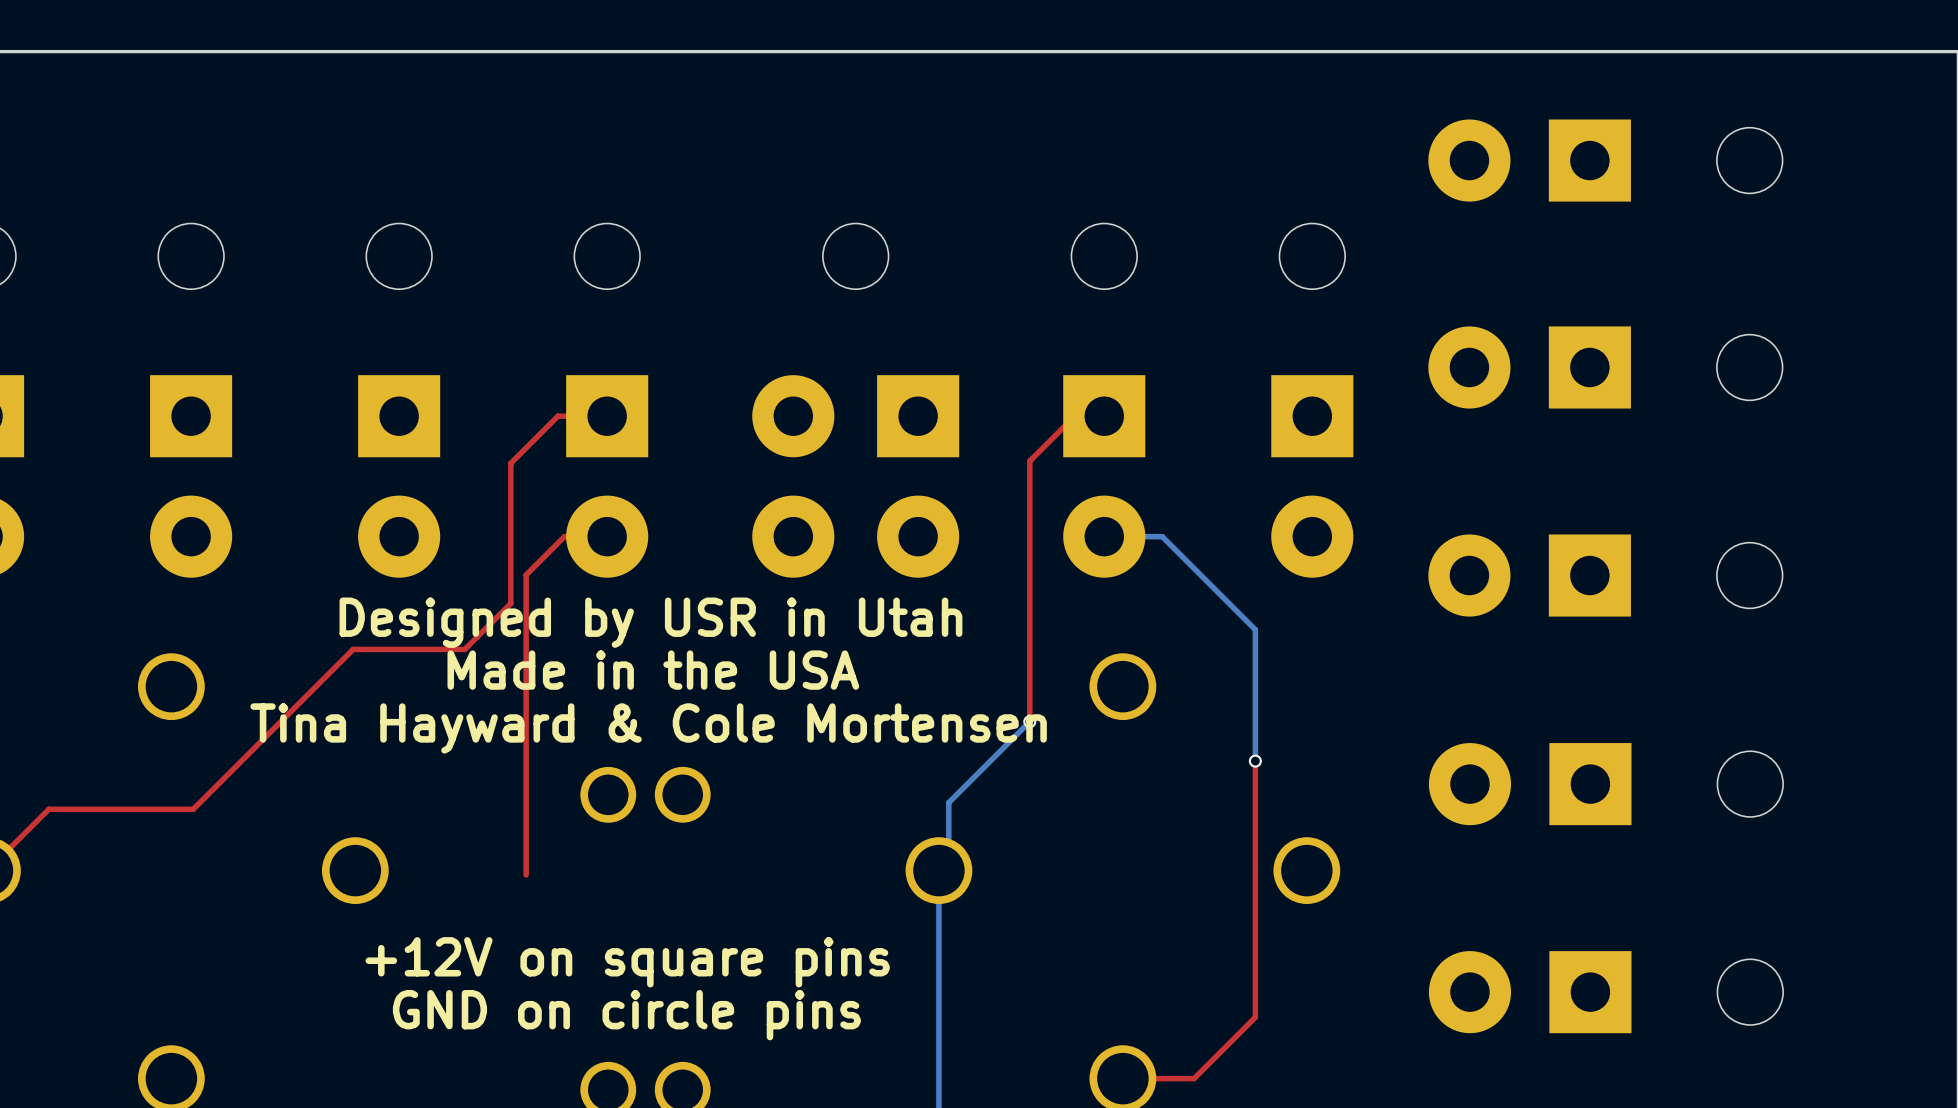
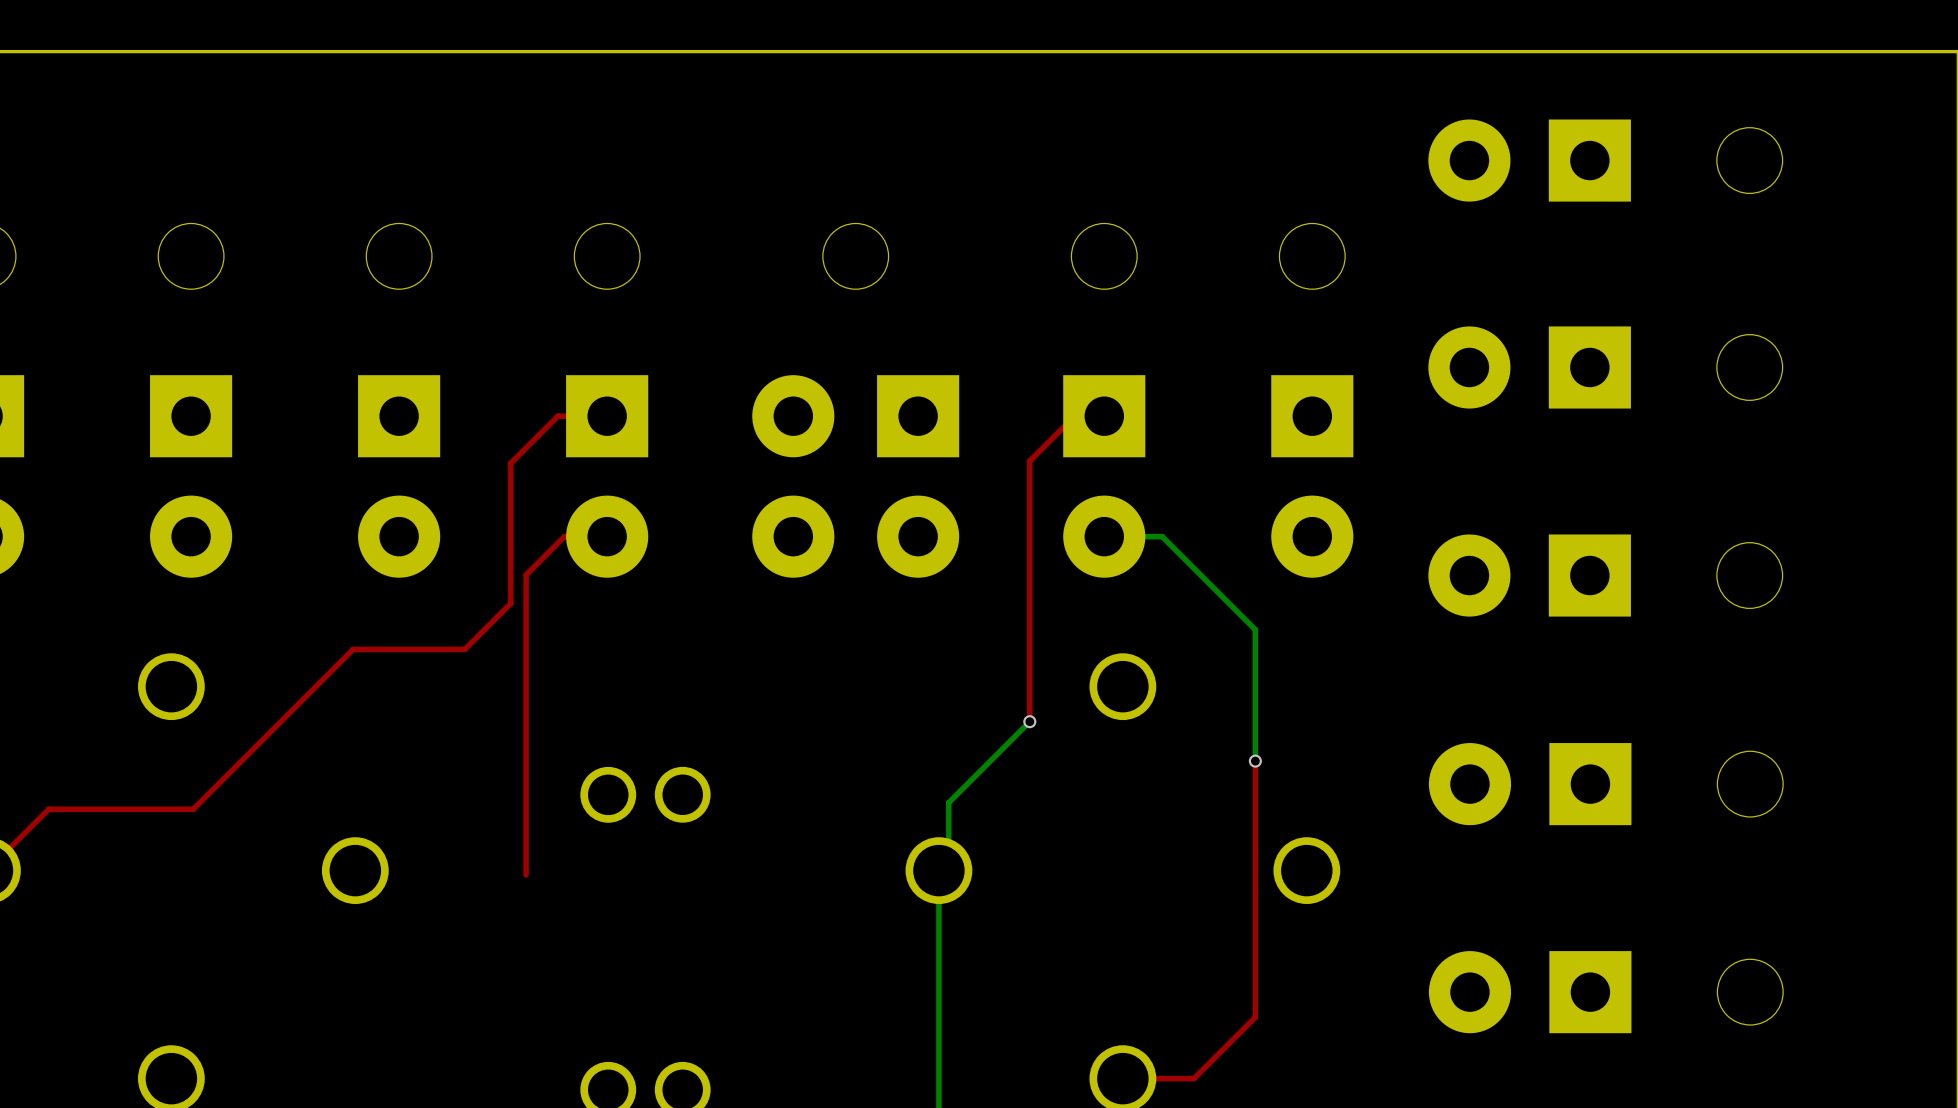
text: Designed by USR in Utah (650, 622) -> none
text: Made in the USA (653, 670) -> none
text: Tina Hayward & Cole Mortensen (648, 728) -> none
text: +12V on square pins (627, 962) -> none
text: GND on circle pins (626, 1015) -> none

